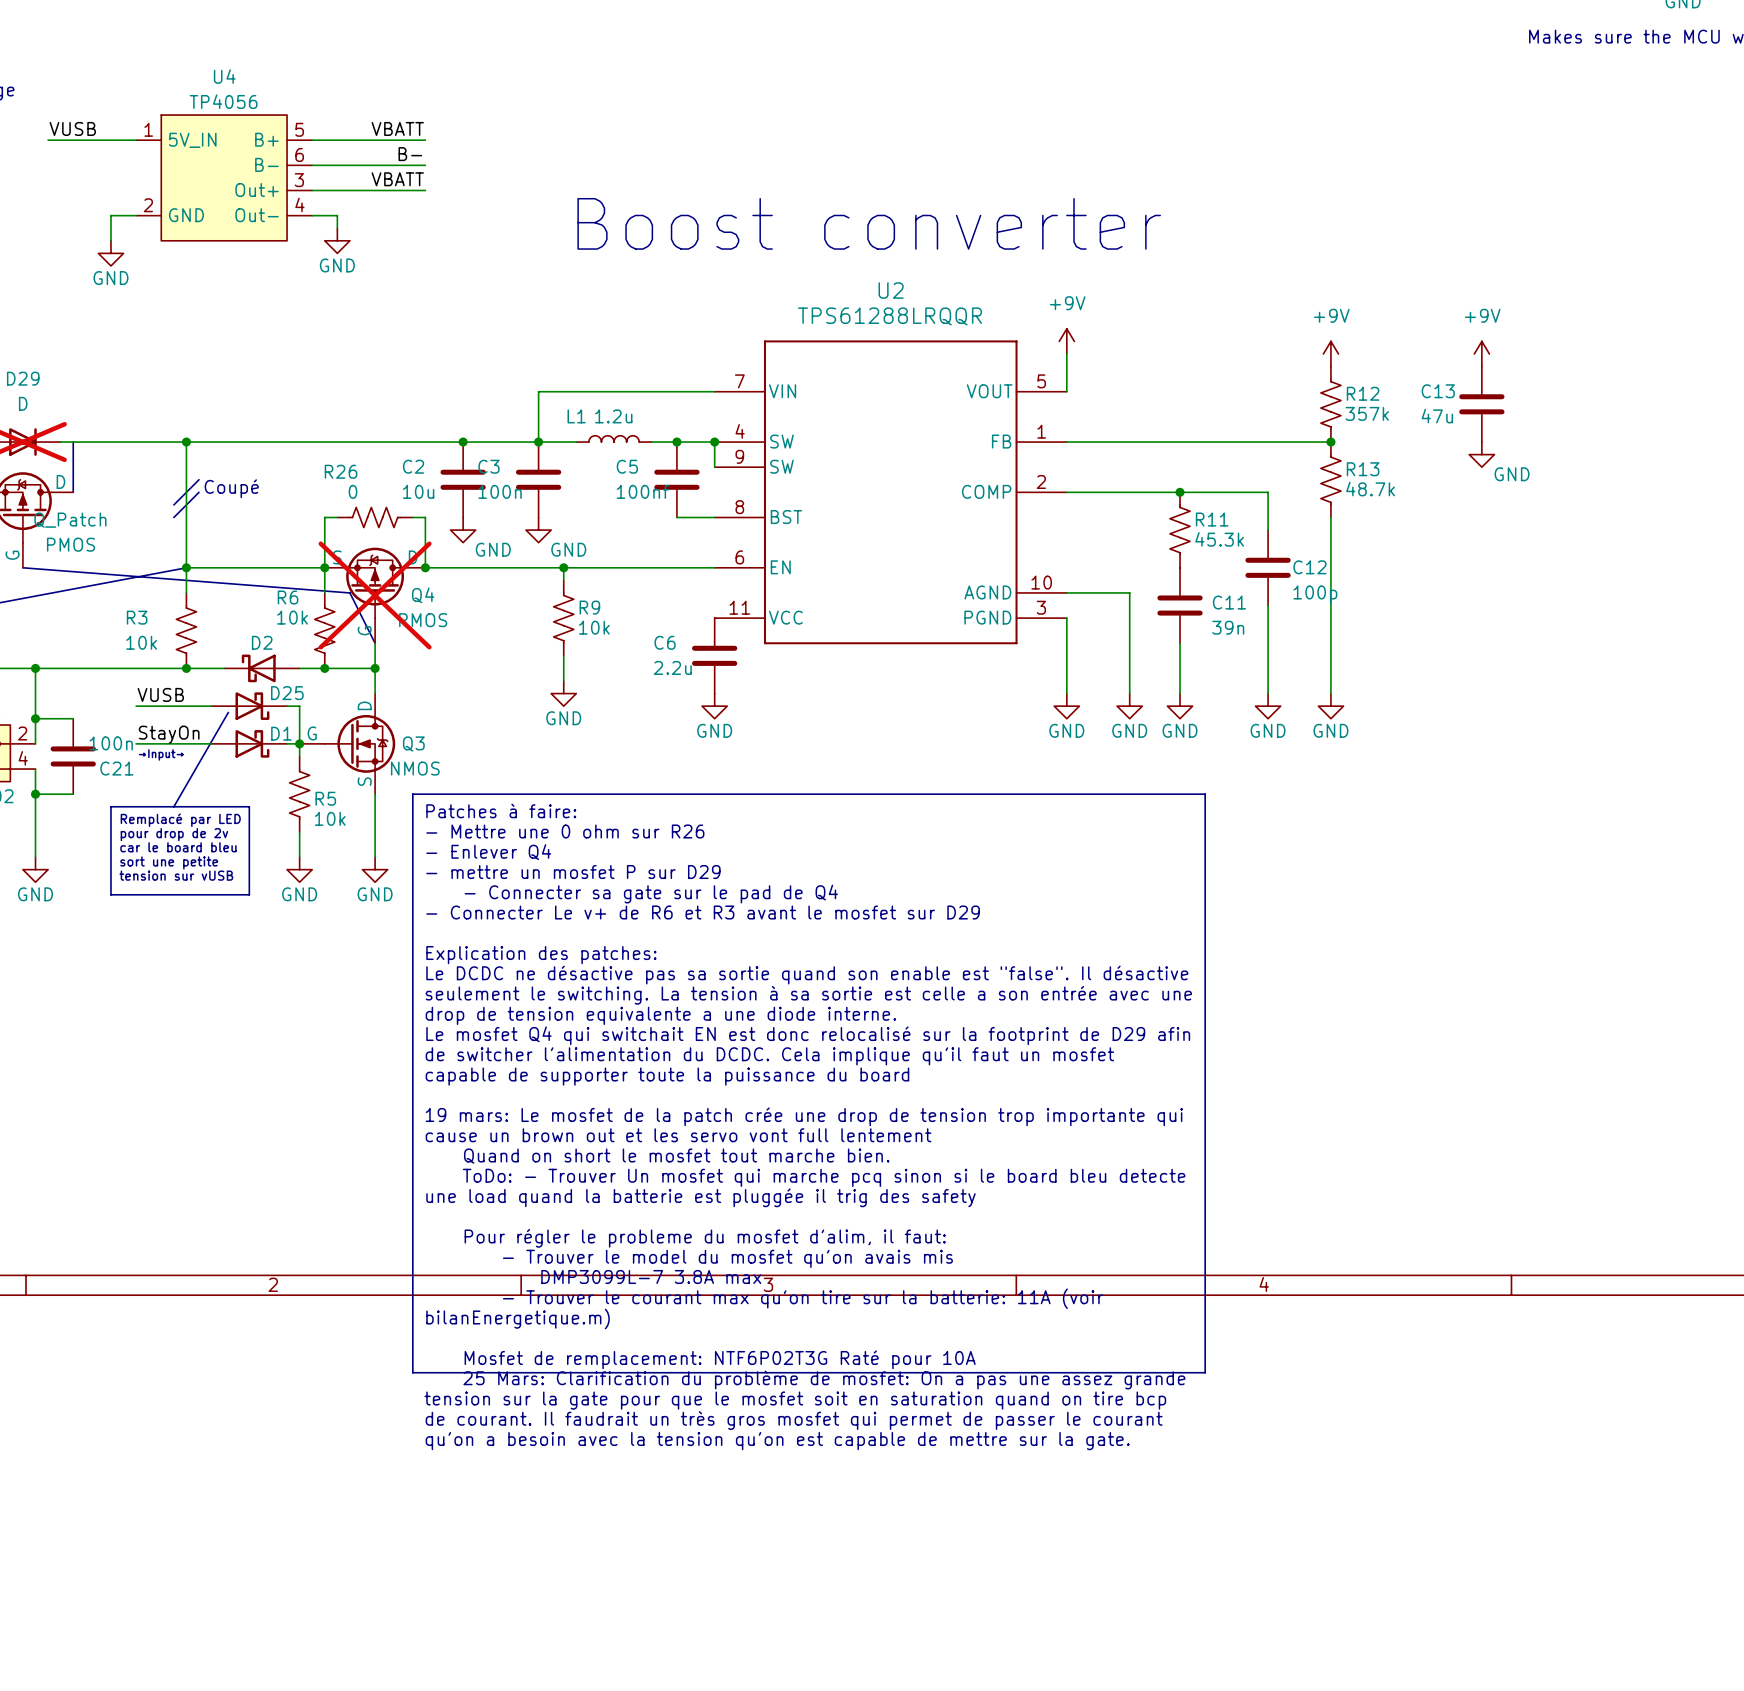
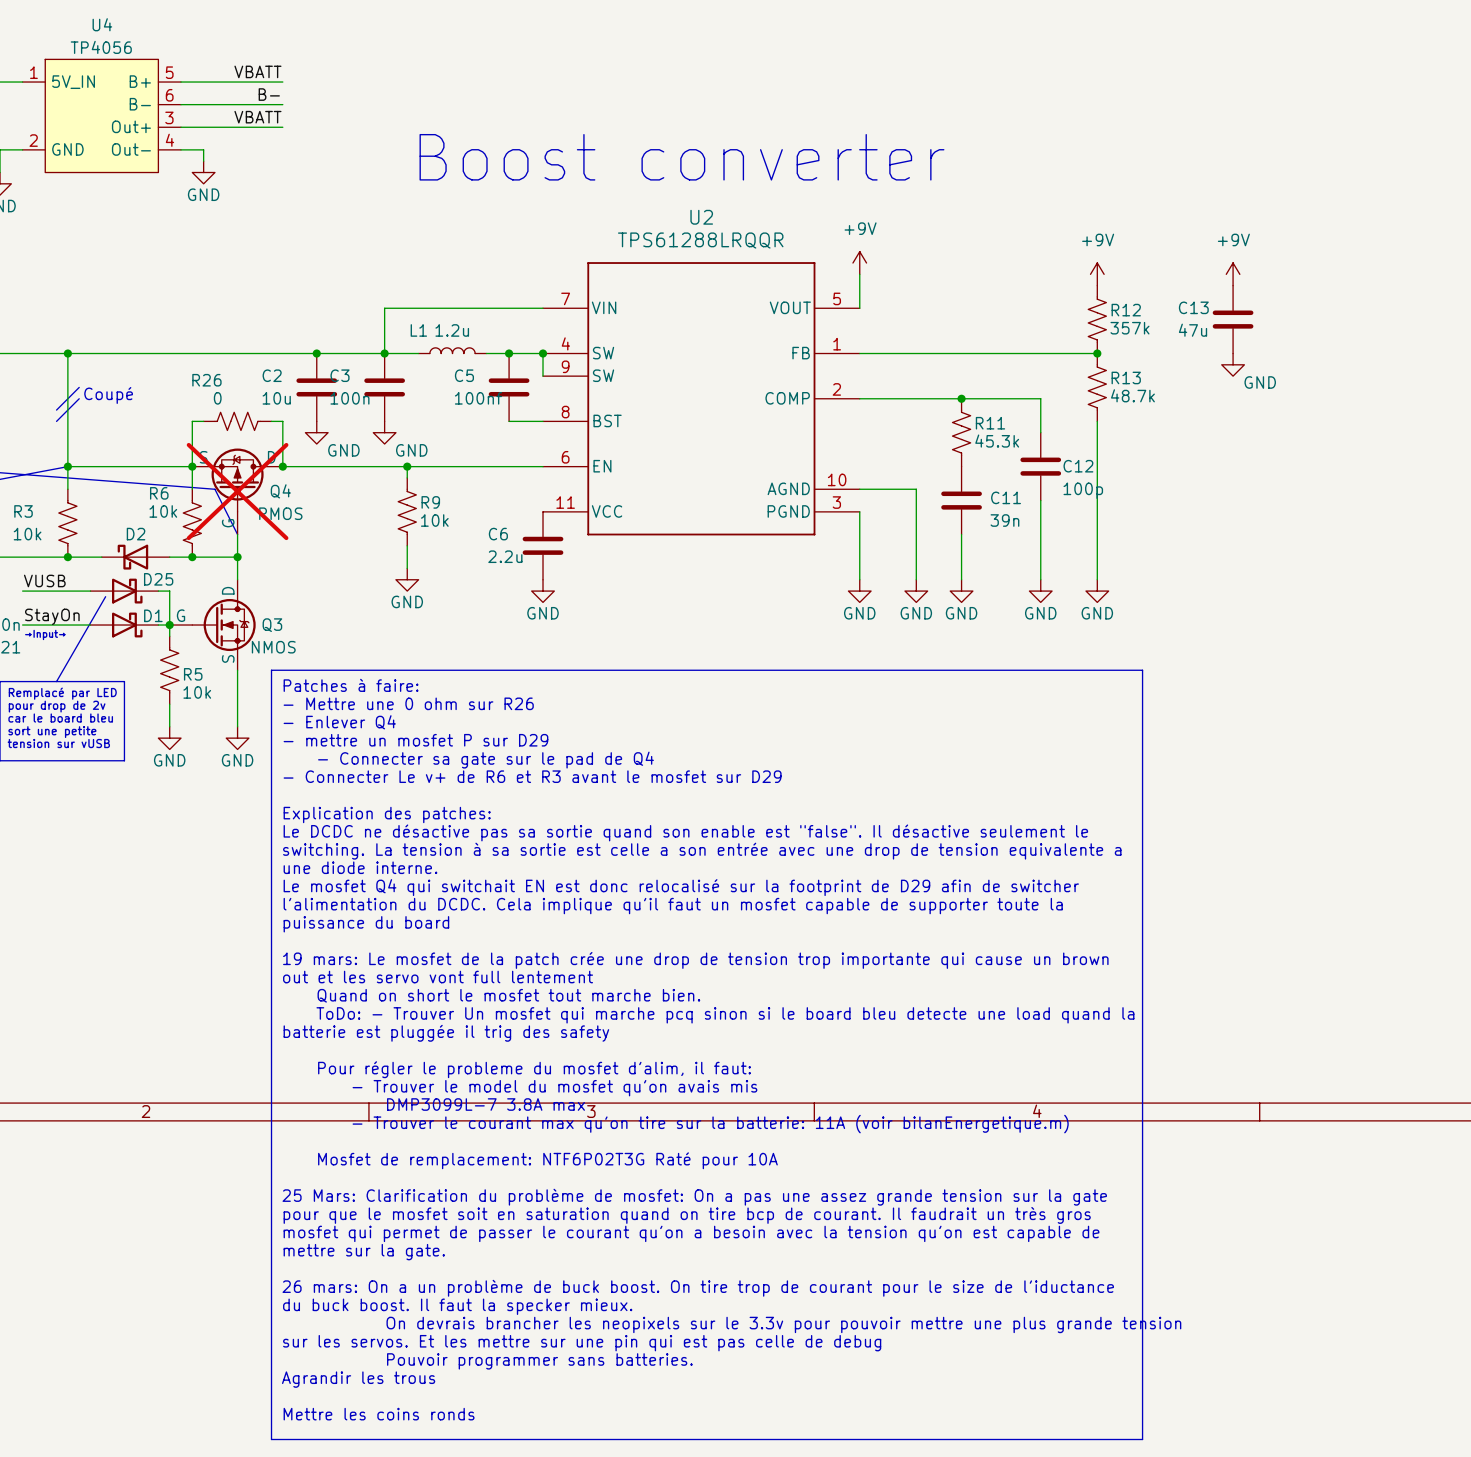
line: (1205, 794) (1205, 1372) (412, 1372) -> (984, 670) (1142, 670) (1142, 1439) (271, 1439) (271, 1190)
text: Le DCDC ne désactive pas sa sortie quand son enable est "false". Il désactive (807, 975) -> Le DCDC ne désactive pas sa sortie quand son enable est "false". Il désactive seulement le (685, 832)
text: seulement le switching. La tension à sa sortie est celle a son entrée avec une (808, 995) -> switching. La tension à sa sortie est celle a son entrée avec une drop de tension equivalente a (702, 851)
text: drop de tension equivalente a une diode interne. (660, 1015) -> une diode interne. (360, 867)
text: Le mosfet Q4 qui switchait EN est donc relocalisé sur la footprint de D29 afin (808, 1035) -> Le mosfet Q4 qui switchait EN est donc relocalisé sur la footprint de D29 afin de switcher (681, 887)
text: de switcher l'alimentation du DCDC. Cela implique qu'il faut un mosfet (769, 1056) -> l'alimentation du DCDC. Cela implique qu'il faut un mosfet capable de supporter toute la (673, 906)
text: capable de supporter toute la puissance du board (667, 1076) -> puissance du board (366, 924)
text: 19 mars: Le mosfet de la patch crée une drop de tension trop importante qui (804, 1116) -> 19 mars: Le mosfet de la patch crée une drop de tension trop importante qui cause un brown (695, 960)
text: cause un brown out et les servo vont full lentement (678, 1135) -> out et les servo vont full lentement (438, 977)
text: ToDo: - Trouver Un mosfet qui marche pcq sinon si le board bleu detecte (824, 1177) -> ToDo: - Trouver Un mosfet qui marche pcq sinon si le board bleu detecte une load quand la (725, 1015)
text: une load quand la batterie est pluggée il trig des safety (700, 1197) -> batterie est pluggée il trig des safety (446, 1033)
text: - Trouver le courant max qu'on tire sur la batterie: 11A (voir (803, 1298) -> - Trouver le courant max qu'on tire sur la batterie: 11A (voir bilanEnergetique.m) (710, 1124)
text: bilanEnergetique.m) (518, 1318) -> none
text position: Mosfet de remplacement: NTF6P02T3G Raté pour 10A (720, 1359) -> Mosfet de remplacement: NTF6P02T3G Raté pour 10A (547, 1160)
text: 25 Mars: Clarification du problème de mosfet: On a pas une assez grande (824, 1380) -> 25 Mars: Clarification du problème de mosfet: On a pas une assez grande tension sur la gate (694, 1197)
text: tension sur la gate pour que le mosfet soit en saturation quand on tire bcp (795, 1400) -> pour que le mosfet soit en saturation quand on tire bcp de courant. Il faudrait un très gros (687, 1215)
text: de courant. Il faudrait un très gros mosfet qui permet de passer le courant (794, 1420) -> mosfet qui permet de passer le courant qu'on a besoin avec la tension qu'on est capable de (691, 1233)
text: qu'on a besoin avec la tension qu'on est capable de mettre sur la gate. (777, 1441) -> mettre sur la gate. (364, 1252)
text: none -> 26 mars: On a un problème de buck boost. On tire trop de courant pour le size de l'iductance (698, 1288)
text: none -> du buck boost. Il faut la specker mieux. (457, 1306)
text: none -> On devrais brancher les neopixels sur le 3.3v pour pouvoir mettre une plus grande tension (783, 1324)
text: none -> sur les servos. Et les mettre sur une pin qui est pas celle de debug (582, 1343)
text: none -> Pouvoir programmer sans batteries. (539, 1361)
text: none -> Agrandir les trous (358, 1379)
text: none -> Mettre les coins ronds (379, 1414)

